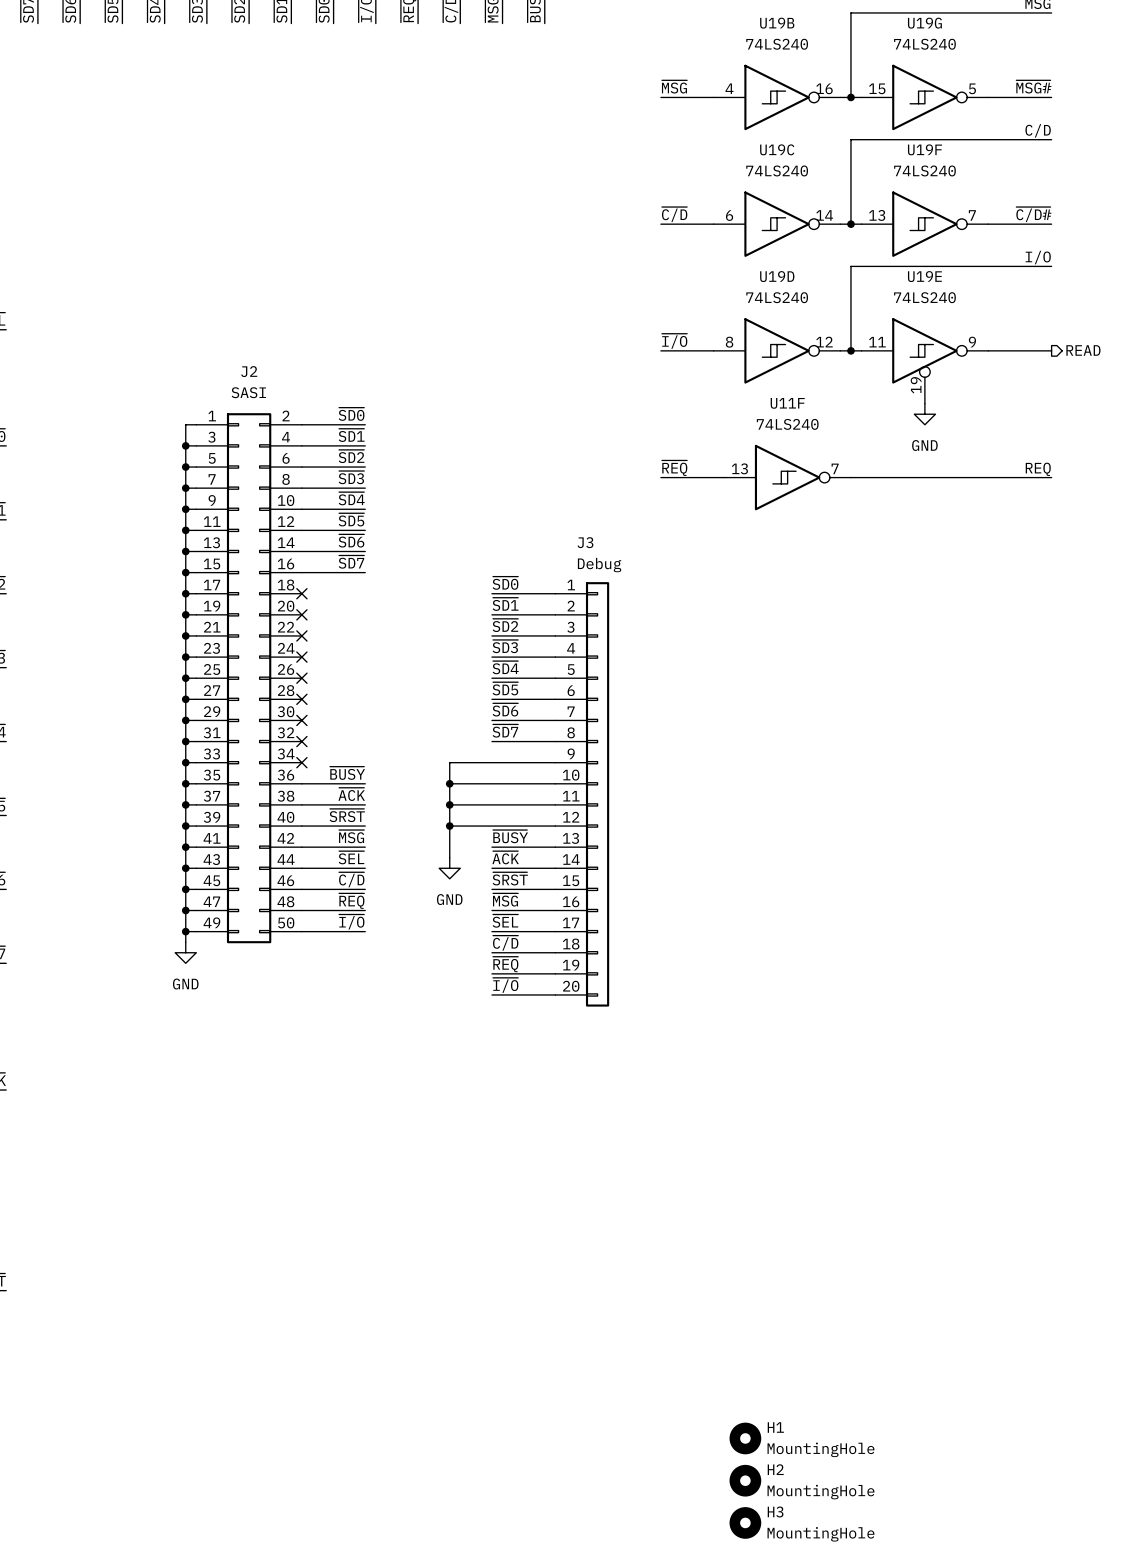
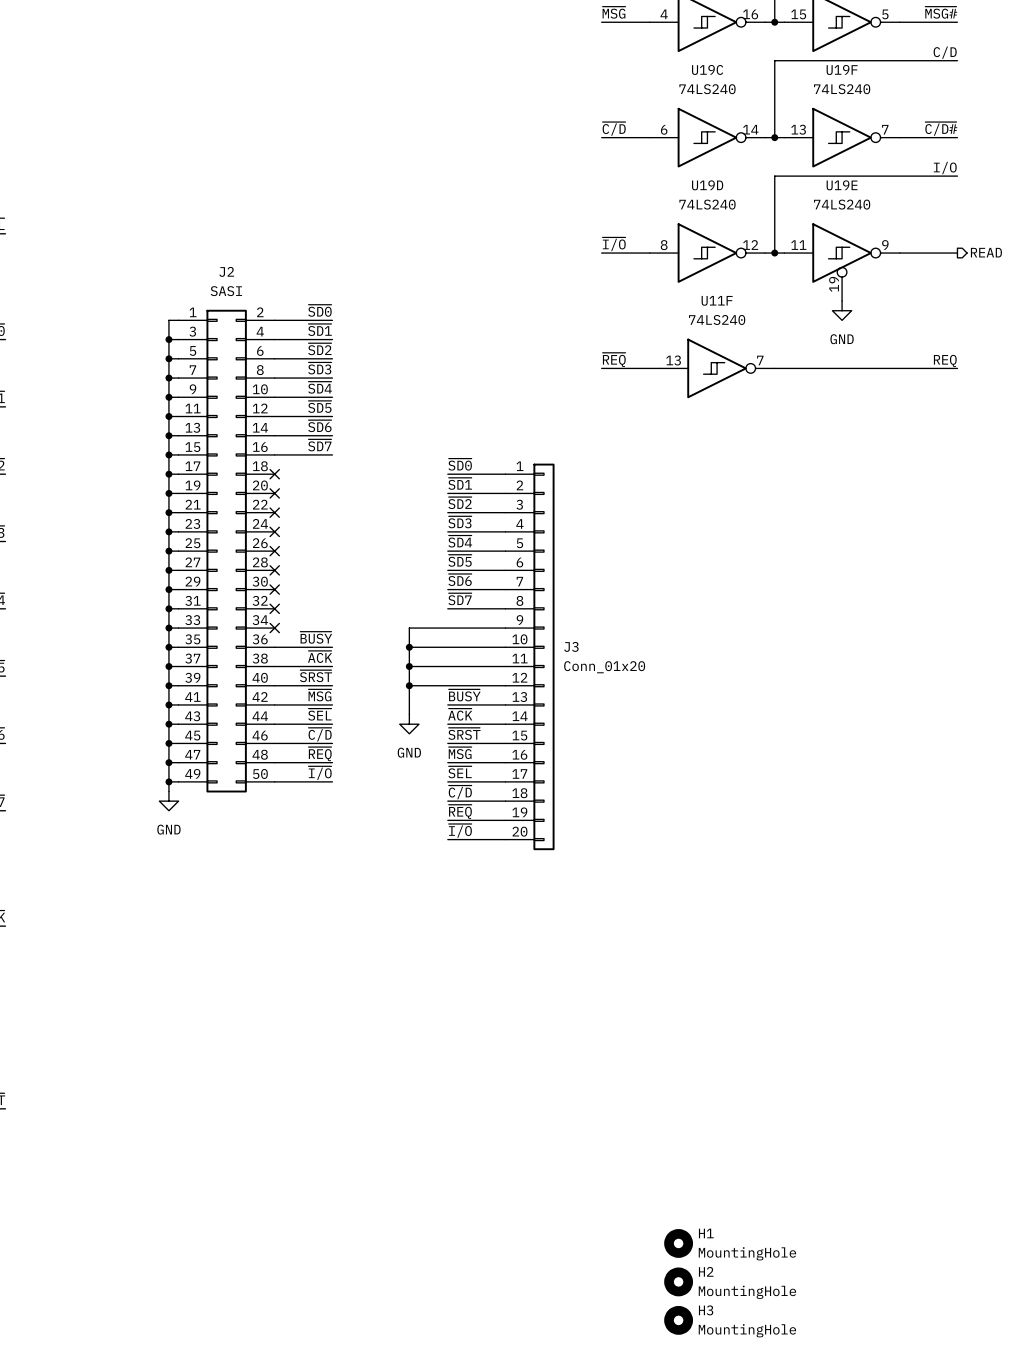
J3 name position: J3 (585, 542) -> J3 (571, 646)
J3 value: Debug (599, 565) -> Conn_01x20 (604, 667)

